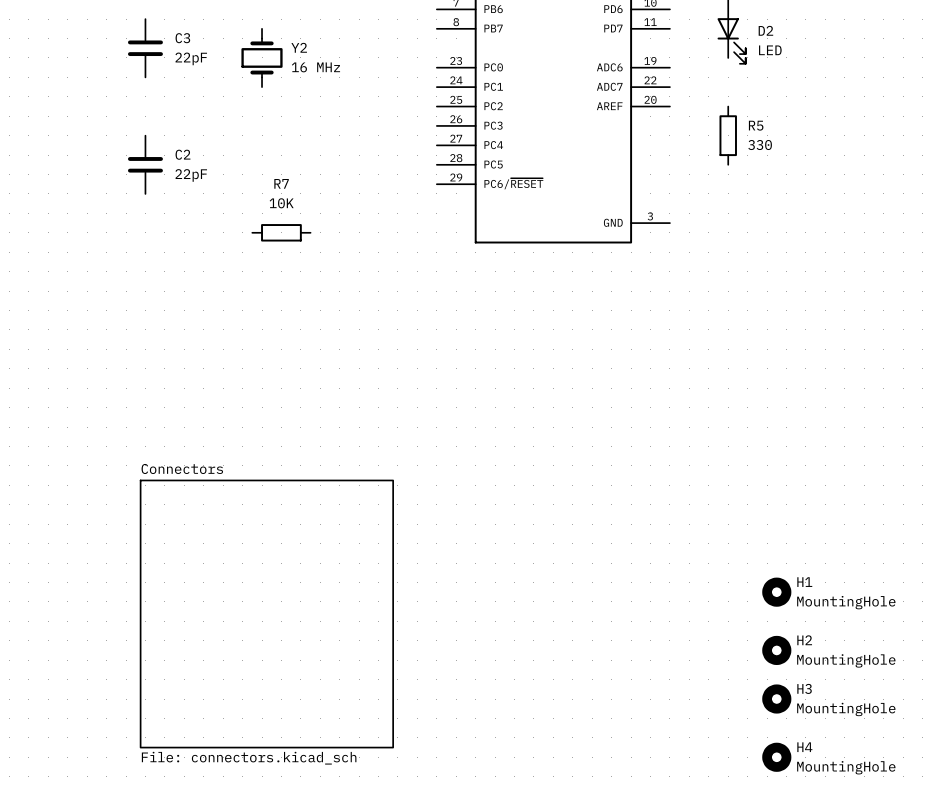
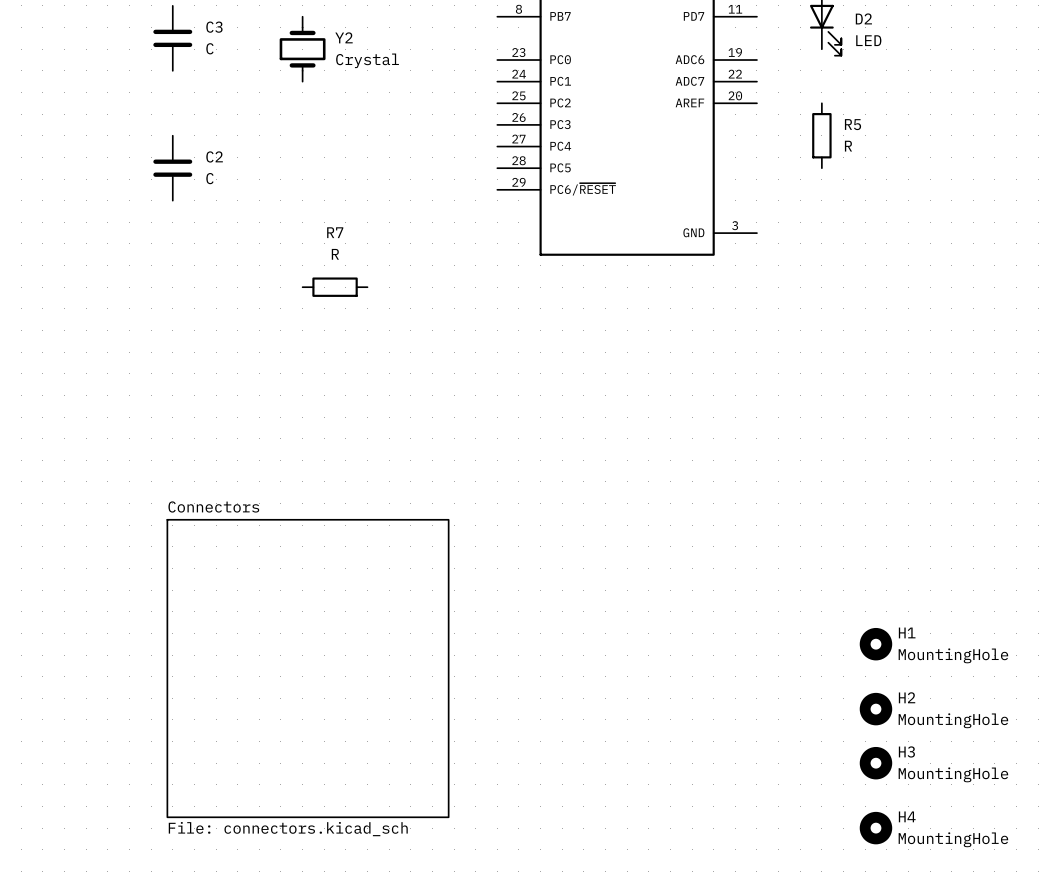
C3 value: 22pF (191, 58) -> C (209, 48)
Y2 value: 16 MHz (315, 67) -> Crystal (367, 60)
R5 value: 330 (760, 145) -> R (848, 146)
C2 value: 22pF (191, 175) -> C (209, 178)
R7 value: 10K (281, 203) -> R (335, 254)
R7 position: (281, 232) -> (335, 287)

